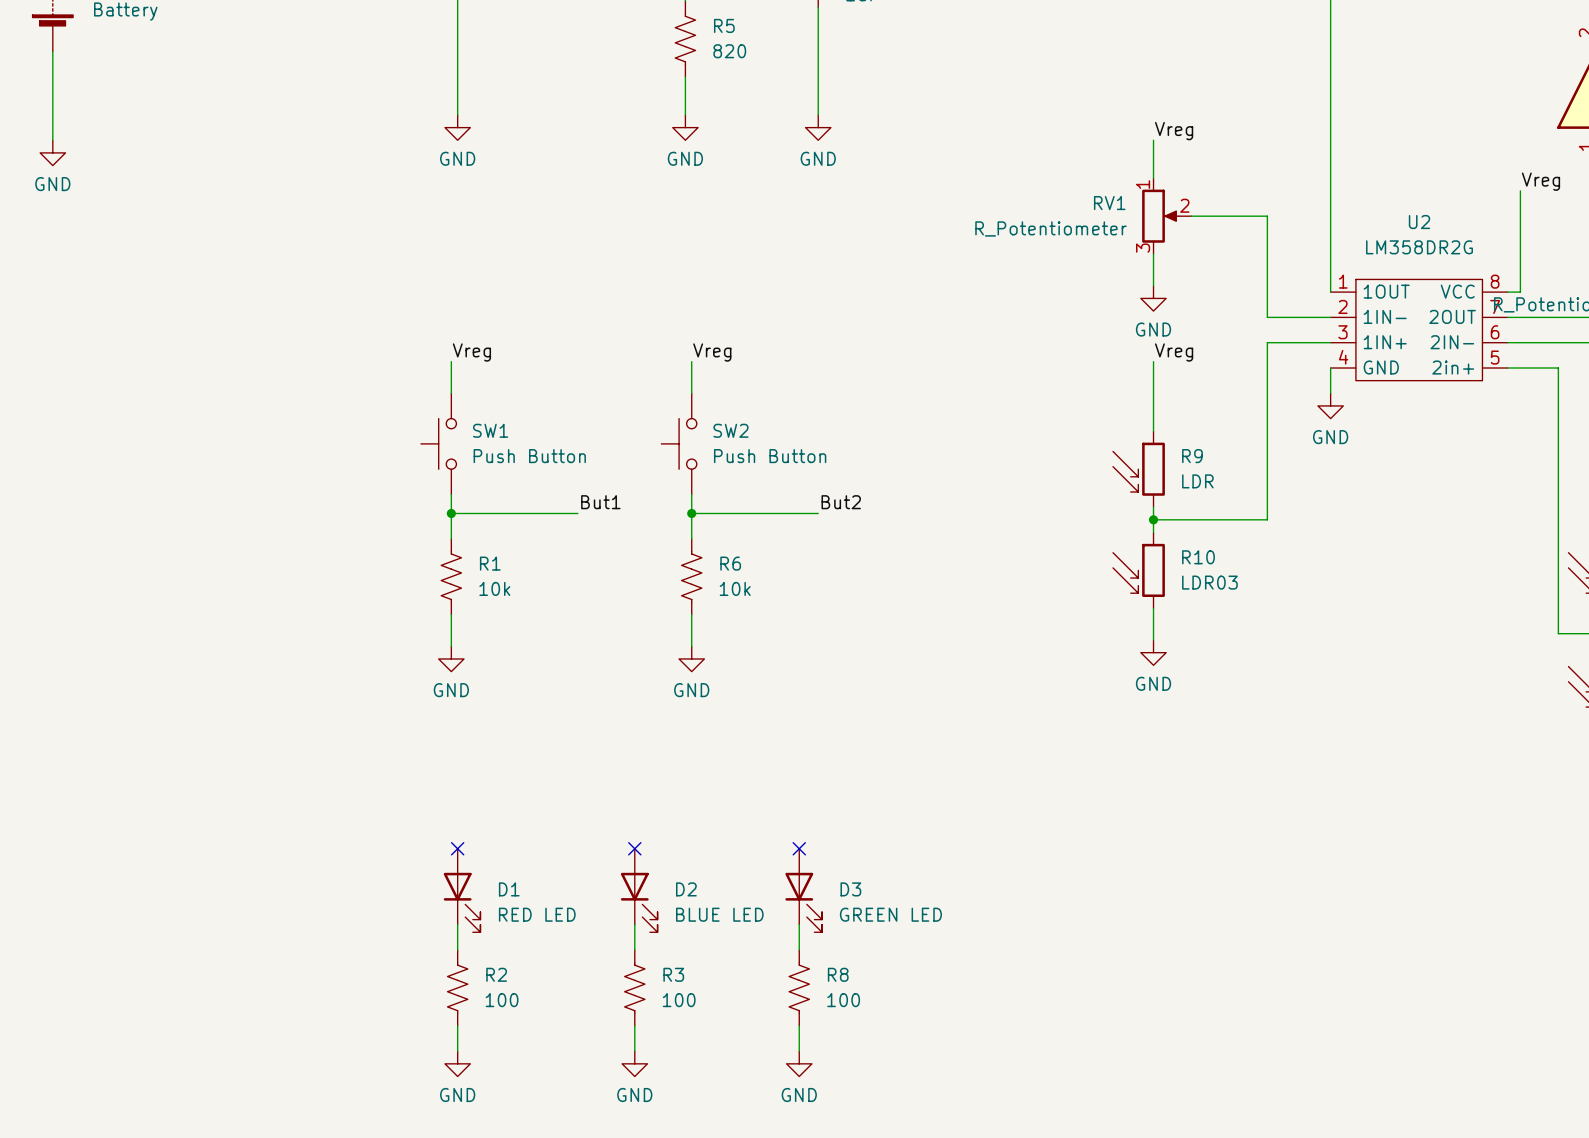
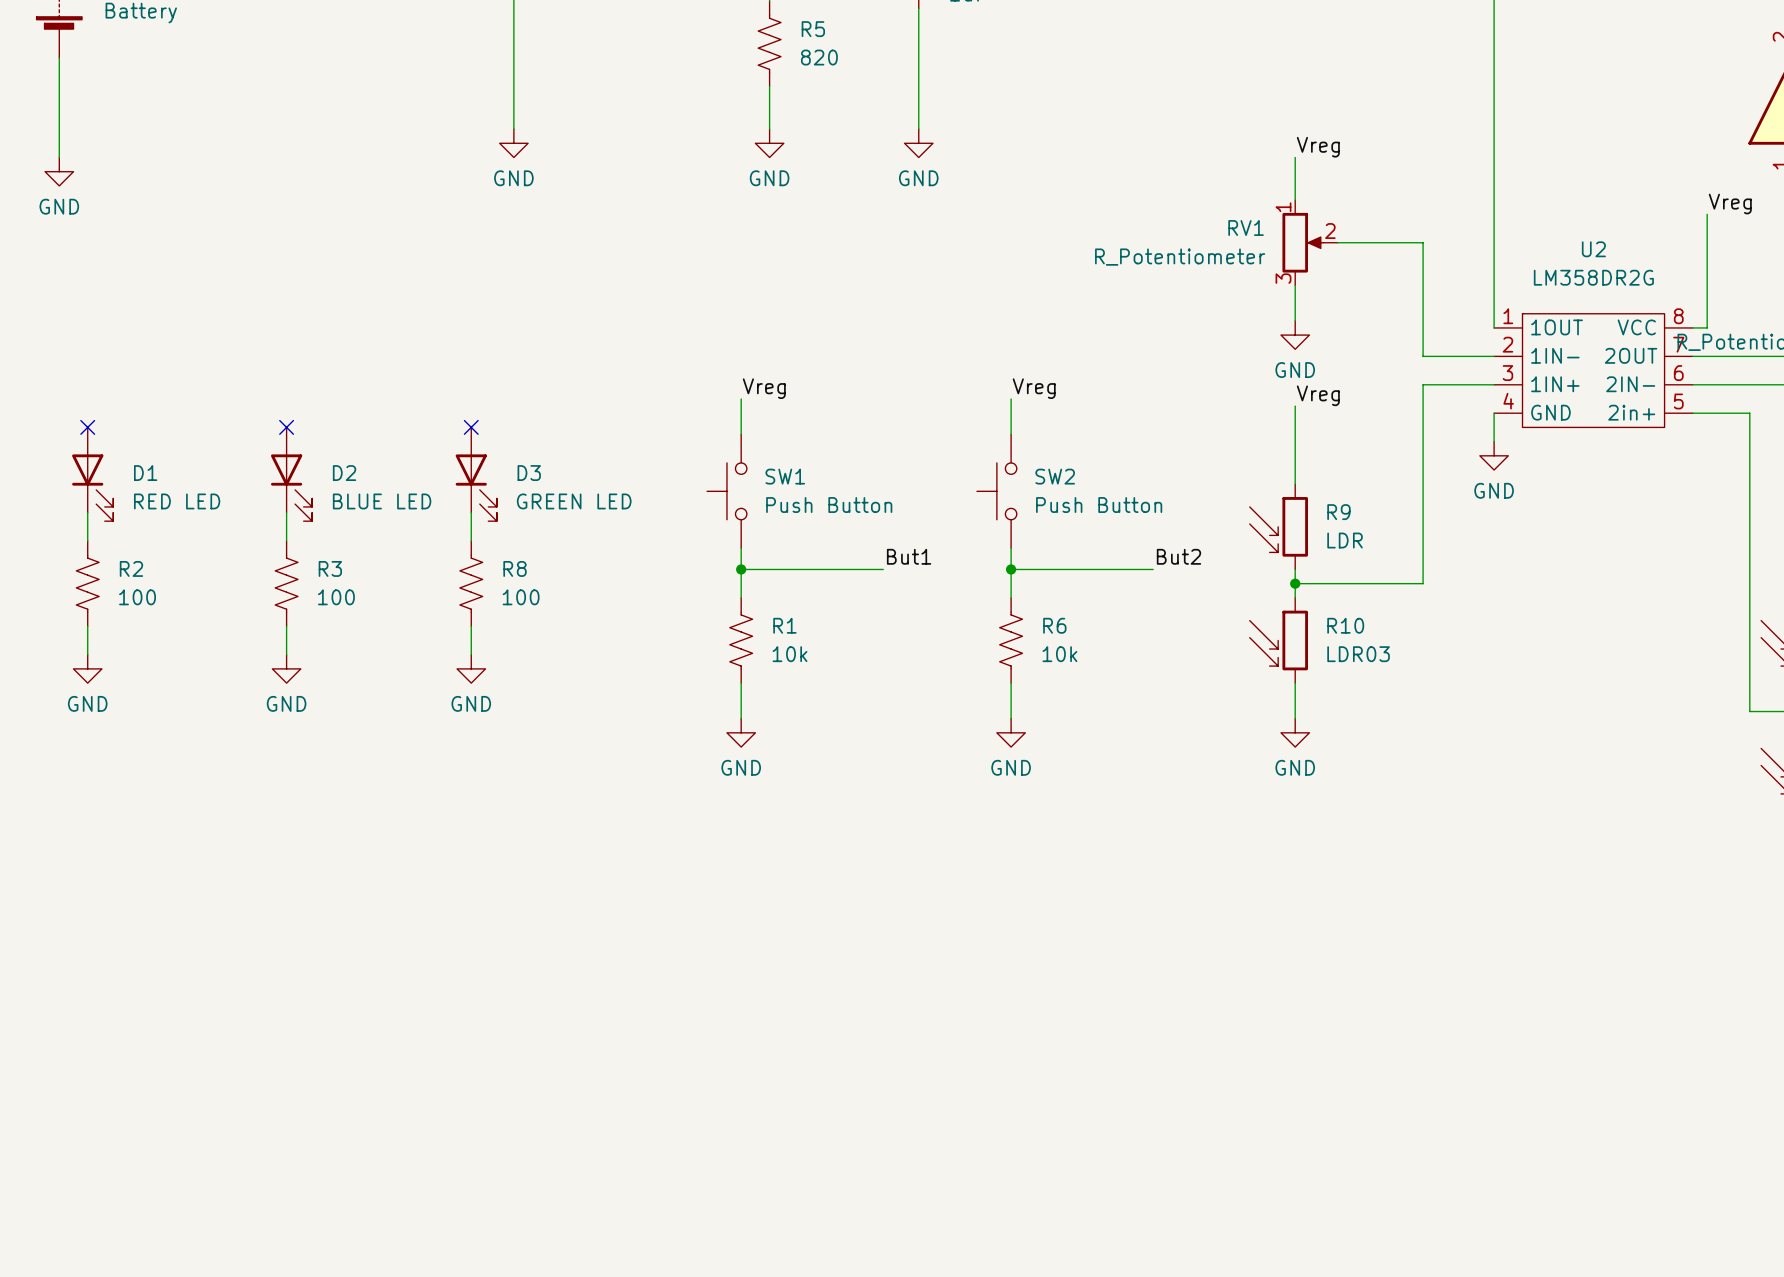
label: none -> Vreg (1034, 388)
label: Vreg (471, 352) -> none
label position: Vreg (712, 352) -> Vreg (764, 388)
wire: (451, 361) (451, 393) -> (741, 399) (741, 434)
wire: (691, 361) (691, 393) -> (1011, 399) (1011, 434)
no-connect mark: none -> (87, 427)
no-connect mark: none -> (286, 427)
no-connect mark: none -> (471, 427)
SW1 position: (438, 443) -> (726, 491)
SW2 position: (679, 443) -> (996, 491)
wire: none -> (87, 512) (87, 541)
wire: none -> (286, 512) (286, 541)
wire: none -> (471, 512) (471, 541)
wire: (451, 494) (451, 538) -> (741, 548) (741, 597)
wire: (691, 494) (691, 538) -> (1011, 548) (1011, 597)
label position: But1 (600, 502) -> But1 (909, 556)
label position: But2 (841, 502) -> But2 (1178, 556)
junction: none -> (1011, 569)
wire: (451, 513) (577, 513) -> (741, 569) (883, 569)
junction: (451, 513) -> none
wire: (691, 513) (818, 513) -> (1011, 569) (1153, 569)
junction position: (691, 513) -> (741, 569)
wire: none -> (87, 626) (87, 654)
wire: none -> (286, 626) (286, 654)
wire: none -> (471, 626) (471, 654)
R1 position: (451, 576) -> (741, 640)
R6 position: (691, 576) -> (1011, 640)
power symbol: none -> GND (87, 668)
power symbol: none -> GND (286, 668)
wire: (451, 614) (451, 646) -> (741, 683) (741, 718)
wire: (691, 614) (691, 646) -> (1011, 683) (1011, 718)
power symbol: none -> GND (1011, 732)
power symbol position: GND (451, 658) -> GND (471, 668)
power symbol position: GND (691, 658) -> GND (741, 732)
no-connect mark: (457, 848) -> none
no-connect mark: (634, 848) -> none
no-connect mark: (799, 848) -> none
D1 position: (462, 890) -> (92, 474)
D2 position: (639, 890) -> (291, 474)
D3 position: (803, 890) -> (476, 474)
wire: (457, 924) (457, 949) -> none
wire: (634, 924) (634, 949) -> none
wire: (799, 924) (799, 949) -> none
R2 position: (457, 987) -> (87, 583)
R3 position: (634, 987) -> (286, 583)
R8 position: (799, 987) -> (471, 583)
wire: (457, 1025) (457, 1051) -> none
wire: (634, 1025) (634, 1051) -> none
wire: (799, 1025) (799, 1051) -> none
power symbol: GND (457, 1063) -> none
power symbol: GND (634, 1063) -> none
power symbol: GND (799, 1063) -> none

